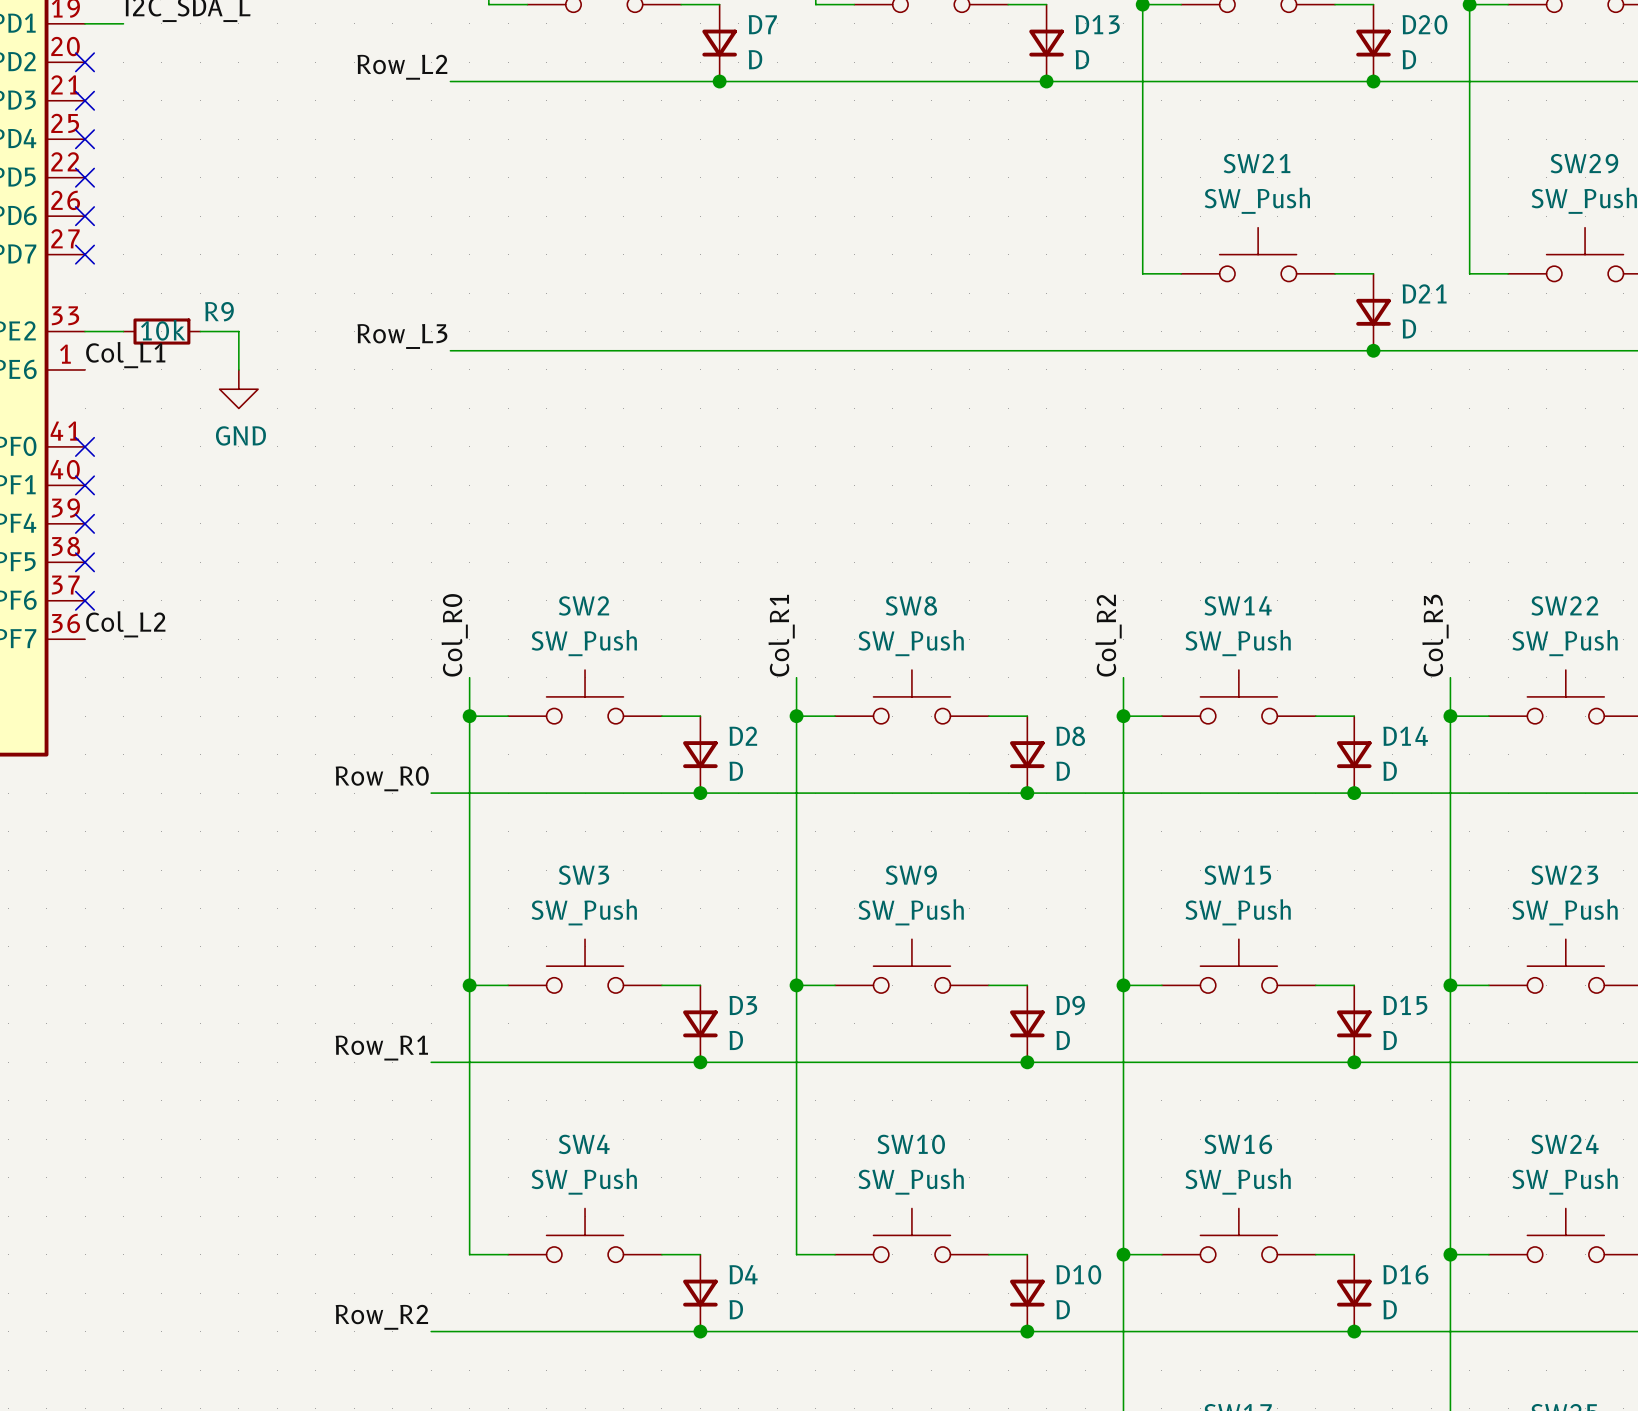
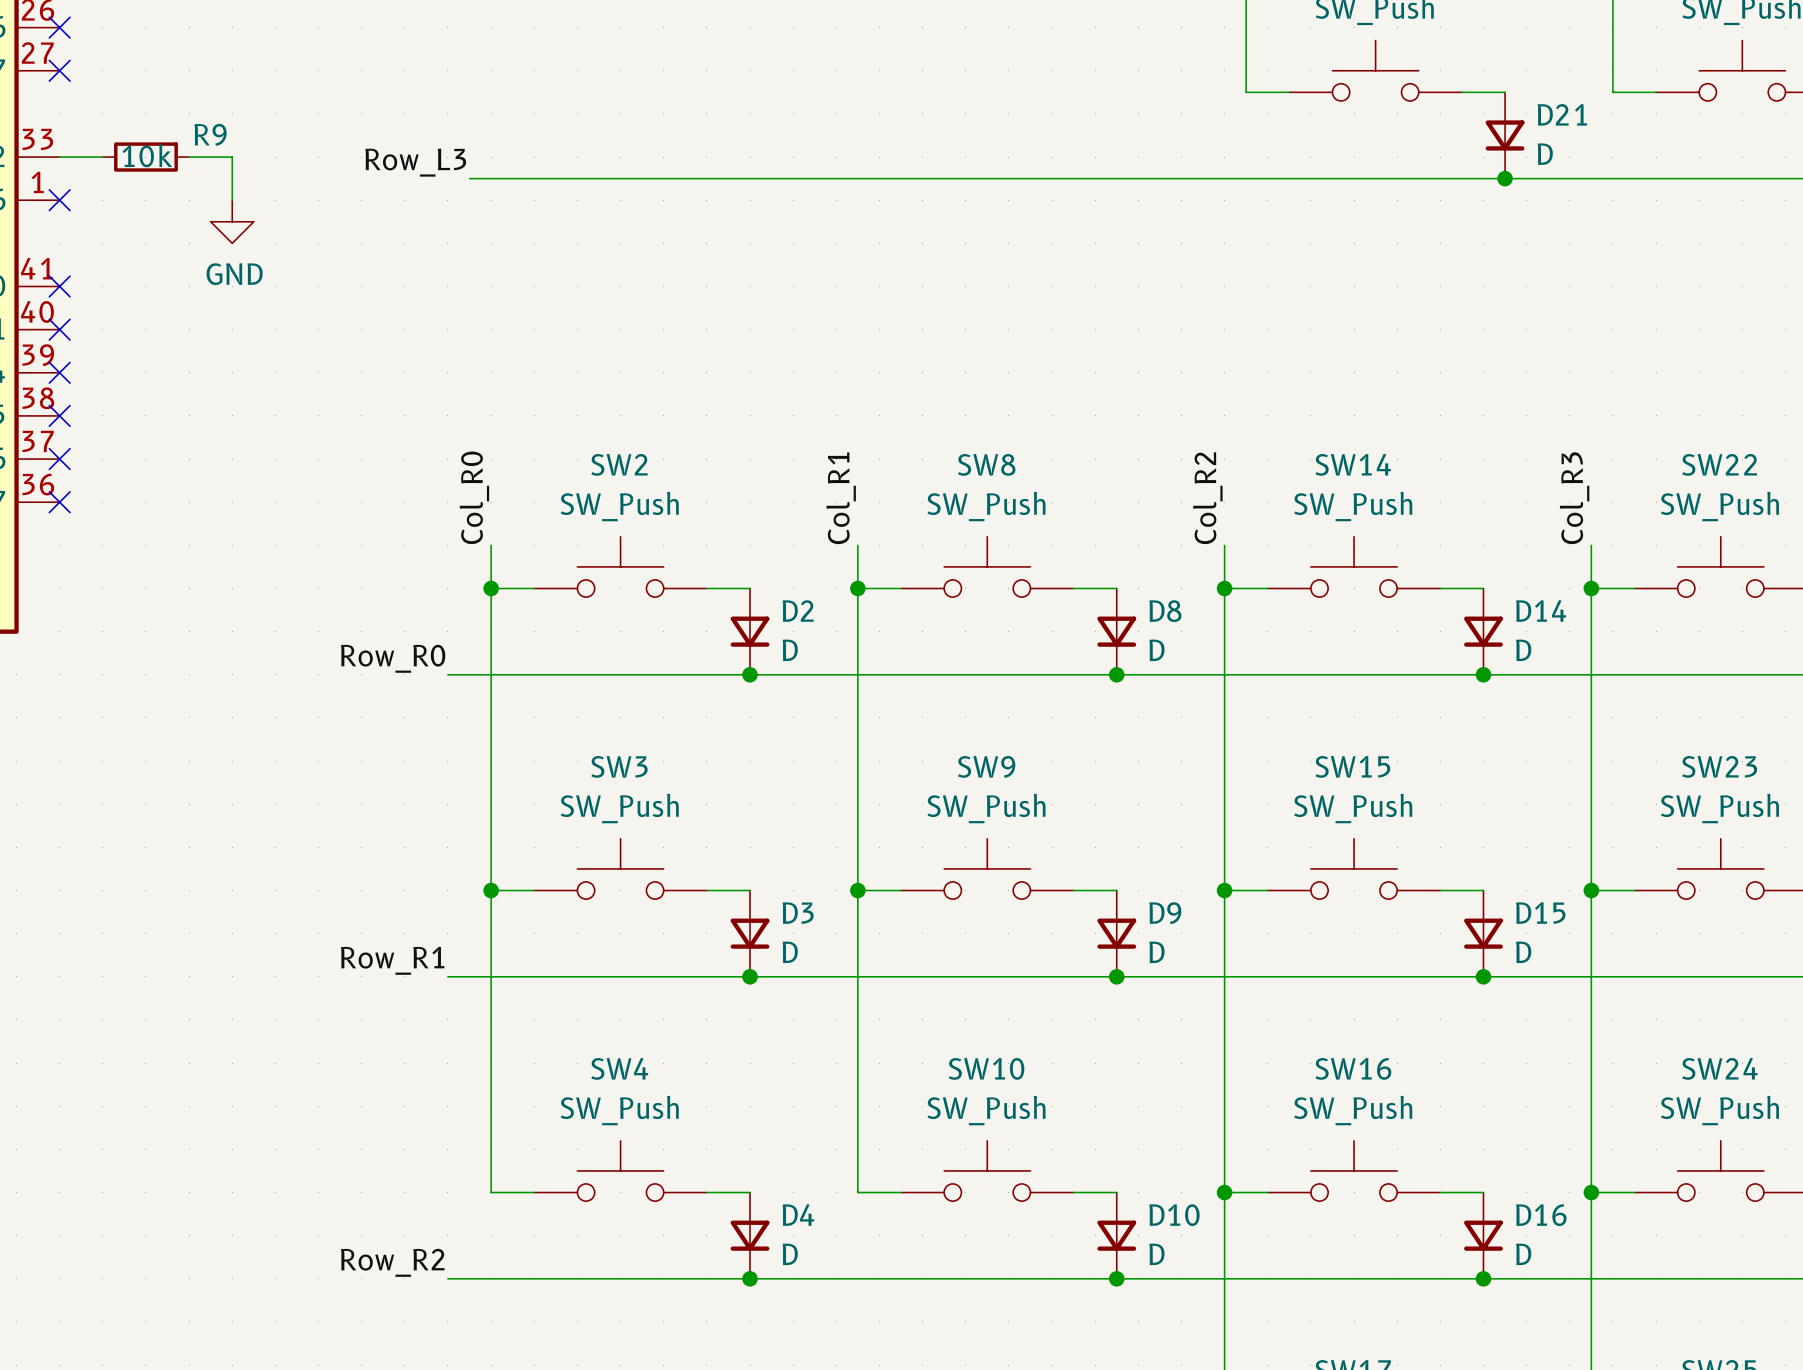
label: Col_L1 (125, 355) -> none
no-connect mark: none -> (59, 200)
label: Col_L2 (125, 624) -> none
no-connect mark: none -> (59, 502)

